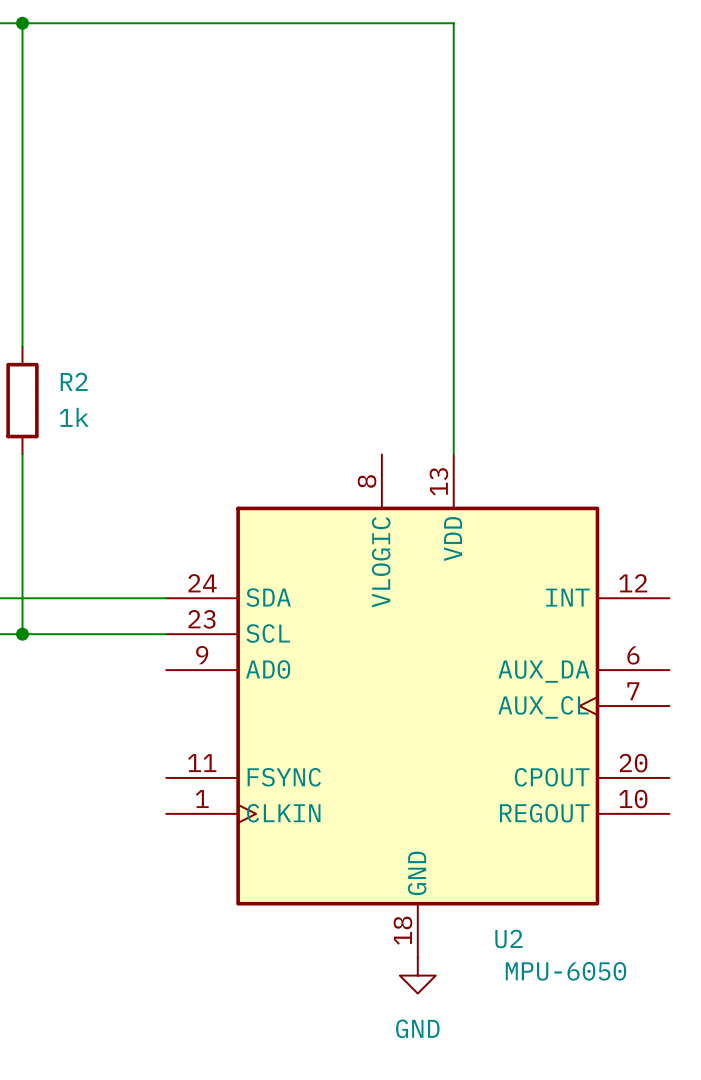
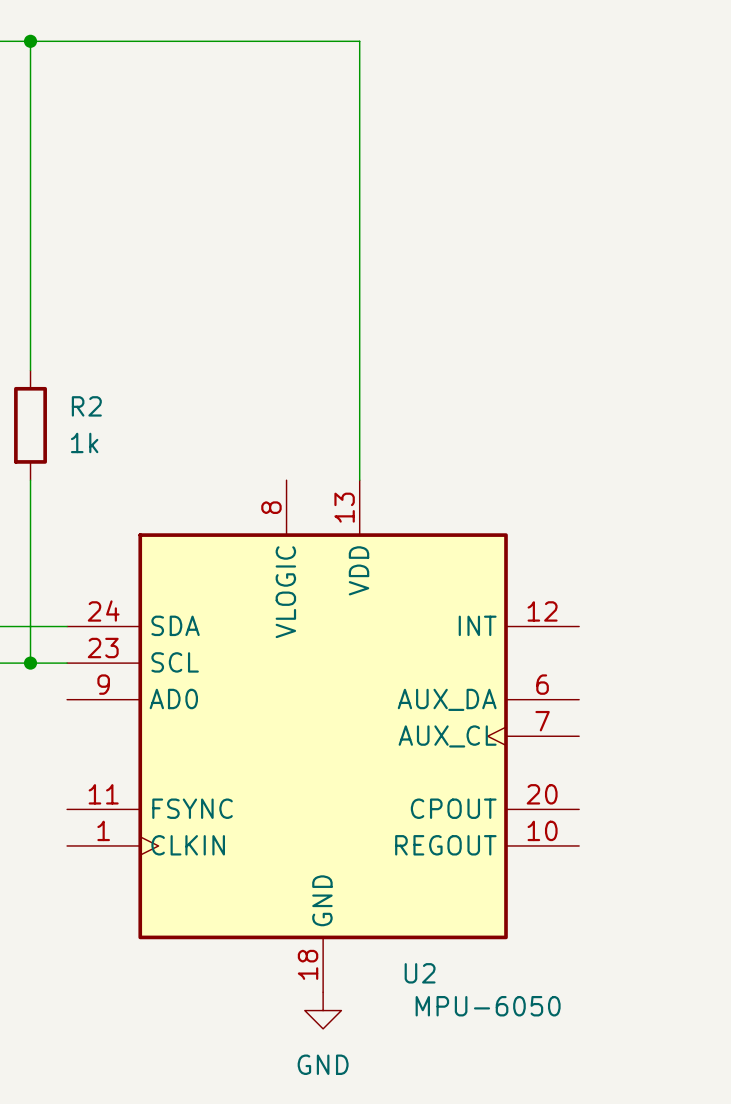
wire: (345, 23) (453, 23) (453, 454) -> (359, 41) (359, 480)
U2 position: (417, 706) -> (323, 736)
power symbol position: GND (417, 975) -> GND (323, 1010)

